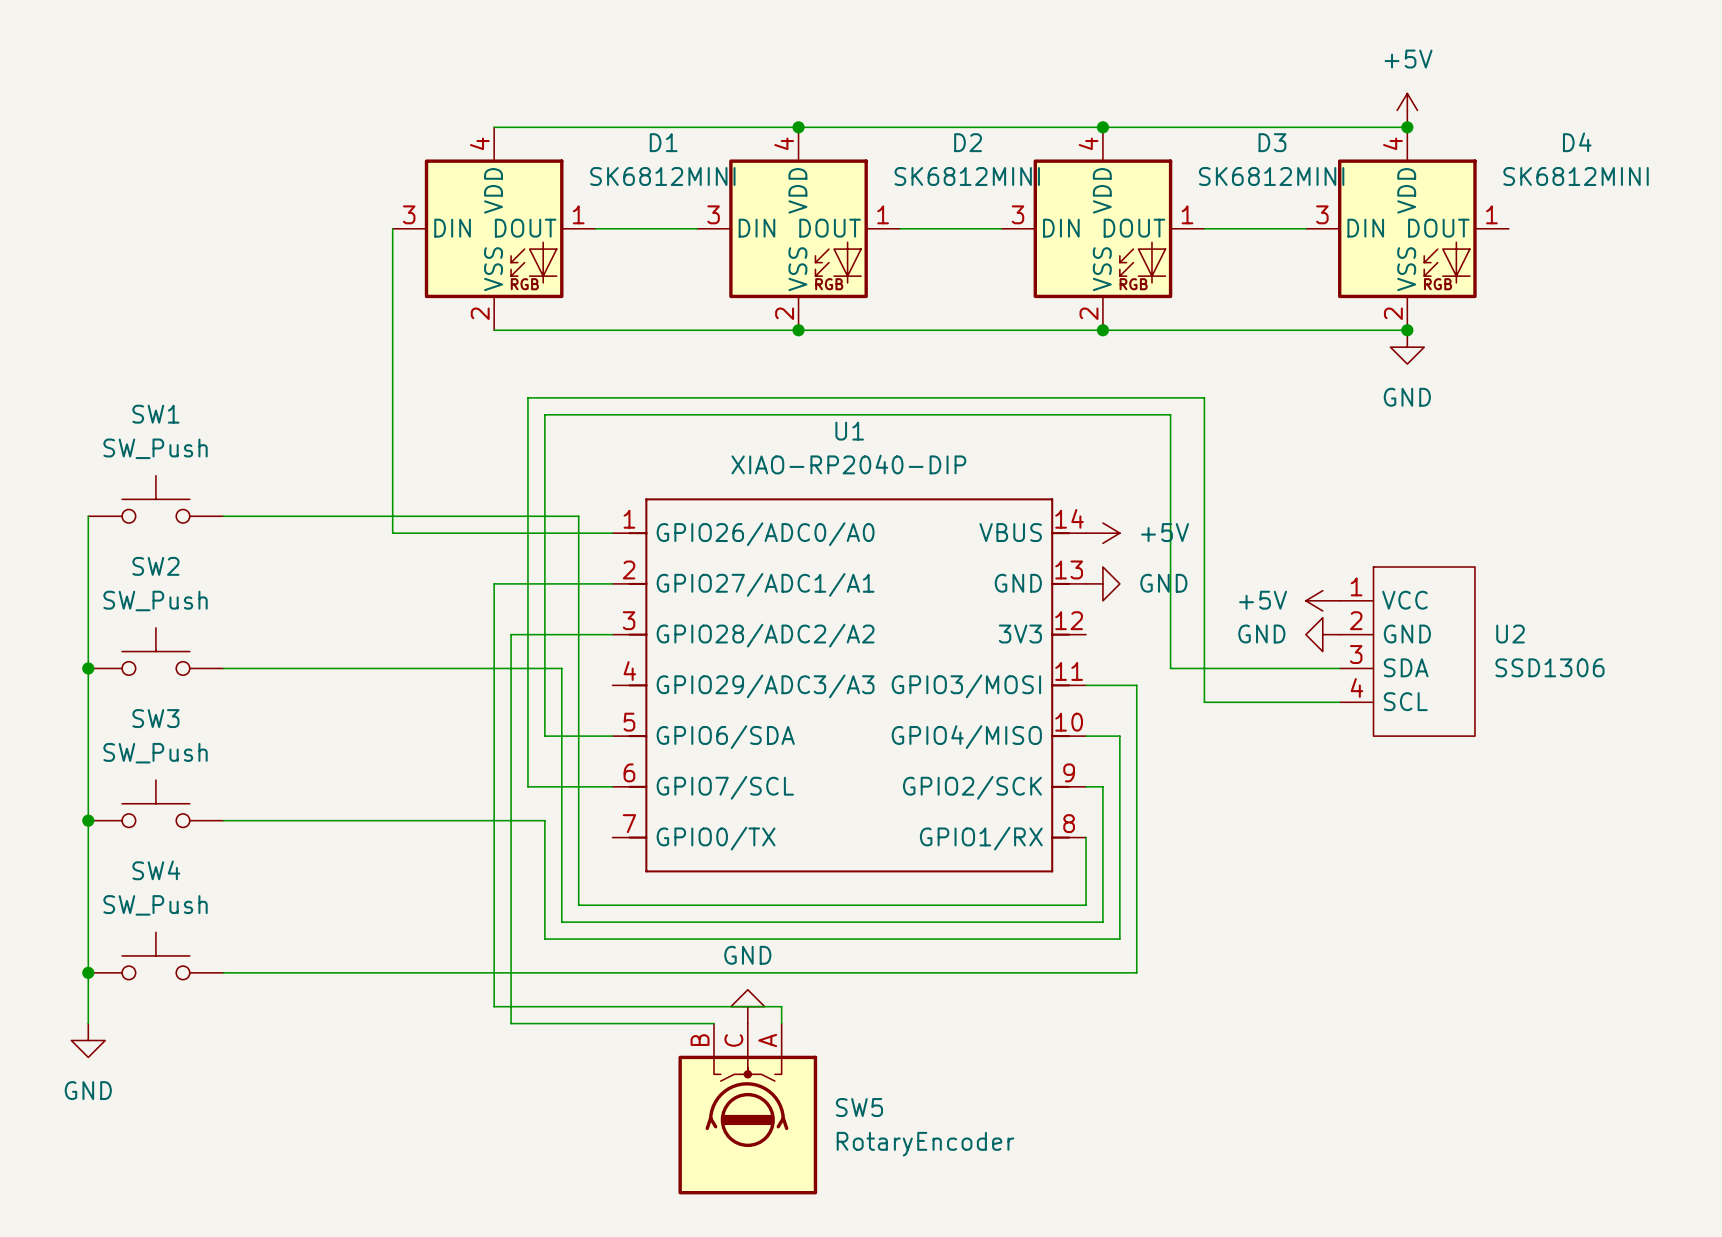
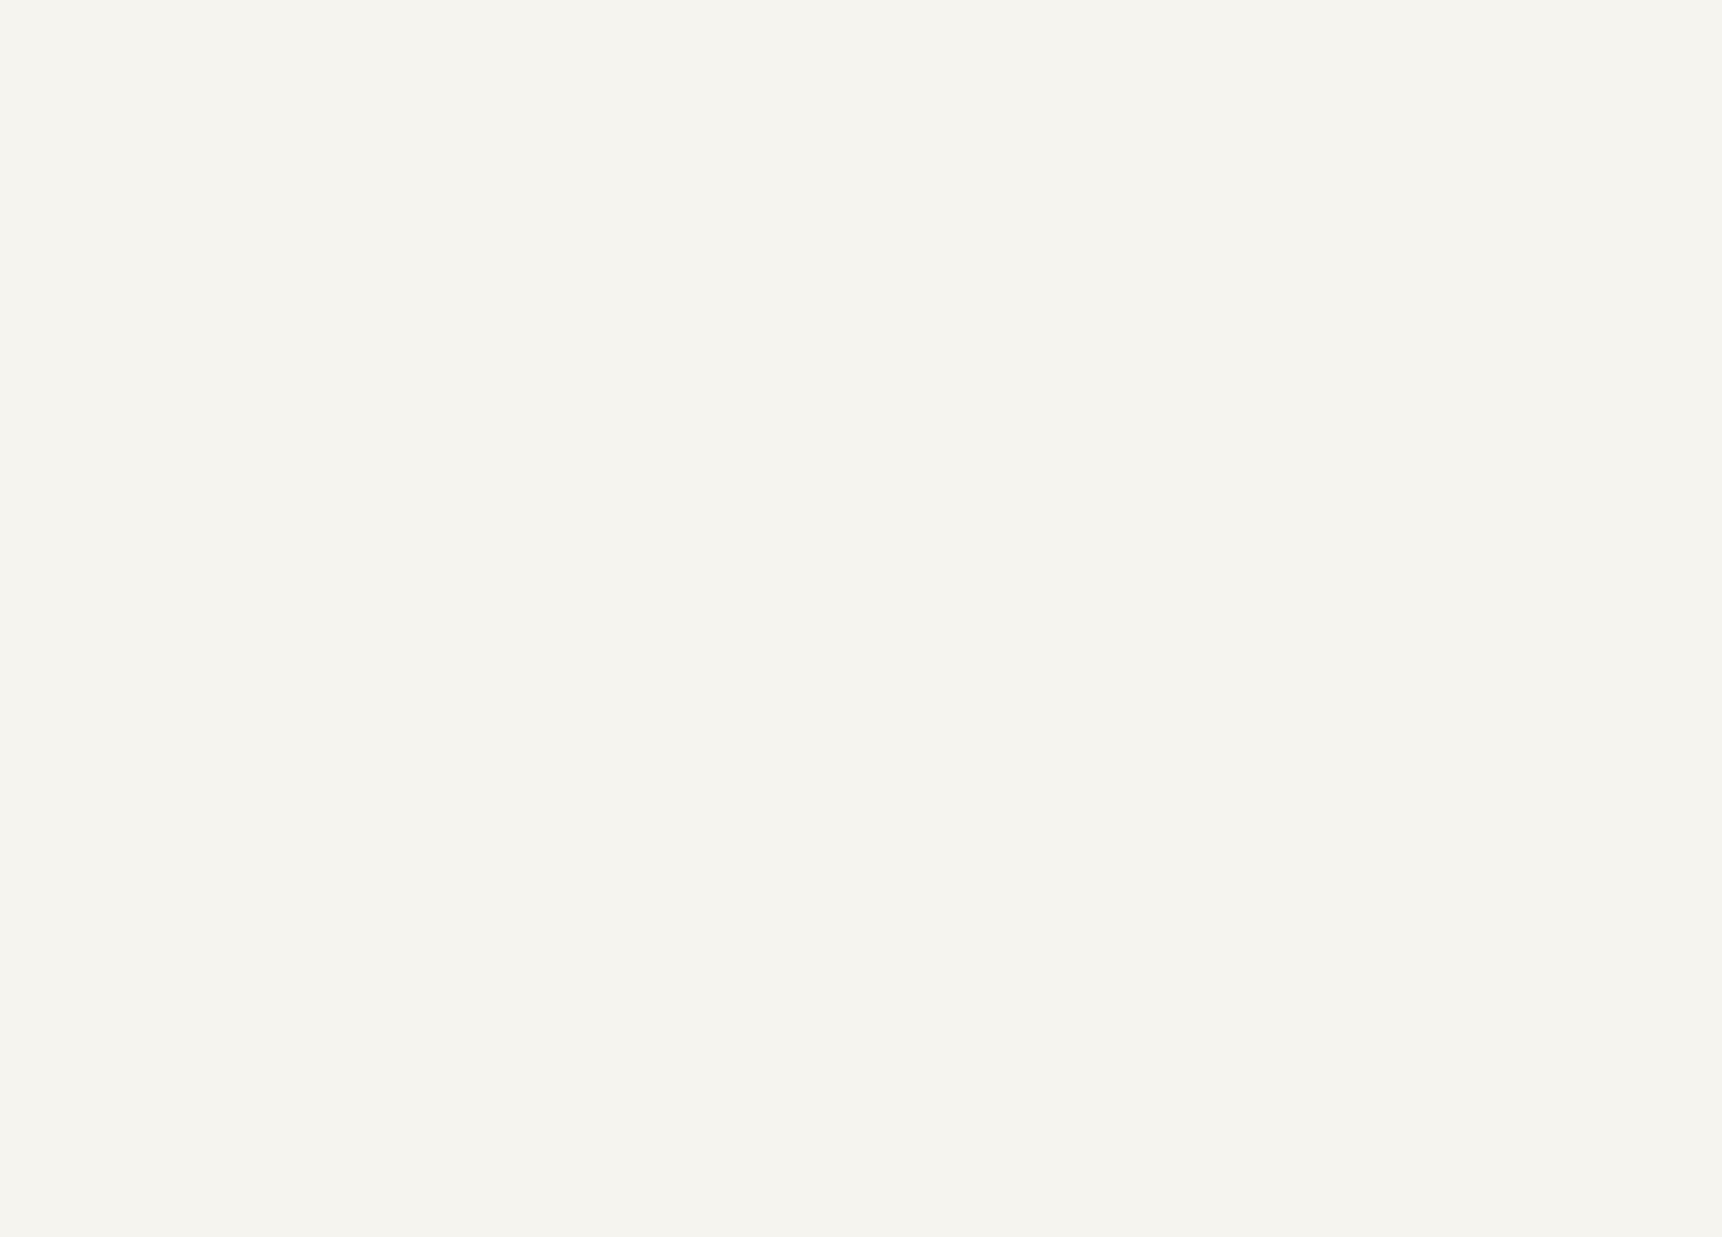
power symbol: +5V (1407, 110) -> none
wire: (494, 127) (1407, 127) -> none
junction: (798, 127) -> none
junction: (1102, 127) -> none
junction: (1407, 127) -> none
wire: (392, 228) (392, 533) (612, 533) -> none
D1: SK6812MINI (494, 228) -> none
wire: (595, 228) (697, 228) -> none
D2: SK6812MINI (798, 228) -> none
wire: (900, 228) (1001, 228) -> none
D3: SK6812MINI (1102, 228) -> none
wire: (1204, 228) (1305, 228) -> none
D4: SK6812MINI (1407, 228) -> none
wire: (494, 330) (1407, 330) -> none
junction: (798, 330) -> none
junction: (1102, 330) -> none
junction: (1407, 330) -> none
power symbol: GND (1407, 347) -> none
SW1: SW_Push (155, 499) -> none
wire: (88, 516) (88, 1023) -> none
wire: (223, 516) (578, 516) (578, 905) (1086, 905) (1086, 837) -> none
power symbol: +5V (1102, 533) -> none
wire: (612, 583) (494, 583) (494, 1006) (781, 1006) (781, 1023) -> none
power symbol: GND (1102, 583) -> none
power symbol: +5V (1322, 600) -> none
wire: (612, 634) (511, 634) (511, 1023) (713, 1023) -> none
power symbol: GND (1322, 634) -> none
SW2: SW_Push (155, 651) -> none
U2: SSD1306 (1407, 651) -> none
junction: (88, 668) -> none
wire: (223, 668) (561, 668) (561, 922) (1102, 922) (1102, 786) (1086, 786) -> none
wire: (1339, 668) (1170, 668) (1170, 414) (544, 414) (544, 736) (612, 736) -> none
U1: XIAO-RP2040-DIP (849, 685) -> none
wire: (1086, 685) (1136, 685) (1136, 972) (223, 972) -> none
wire: (1339, 702) (1204, 702) (1204, 397) (527, 397) (527, 786) (612, 786) -> none
wire: (1086, 736) (1119, 736) (1119, 939) (544, 939) (544, 820) (223, 820) -> none
SW3: SW_Push (155, 803) -> none
junction: (88, 820) -> none
SW4: SW_Push (155, 955) -> none
junction: (88, 972) -> none
power symbol: GND (747, 1006) -> none
power symbol: GND (88, 1040) -> none
SW5: RotaryEncoder (747, 1108) -> none

